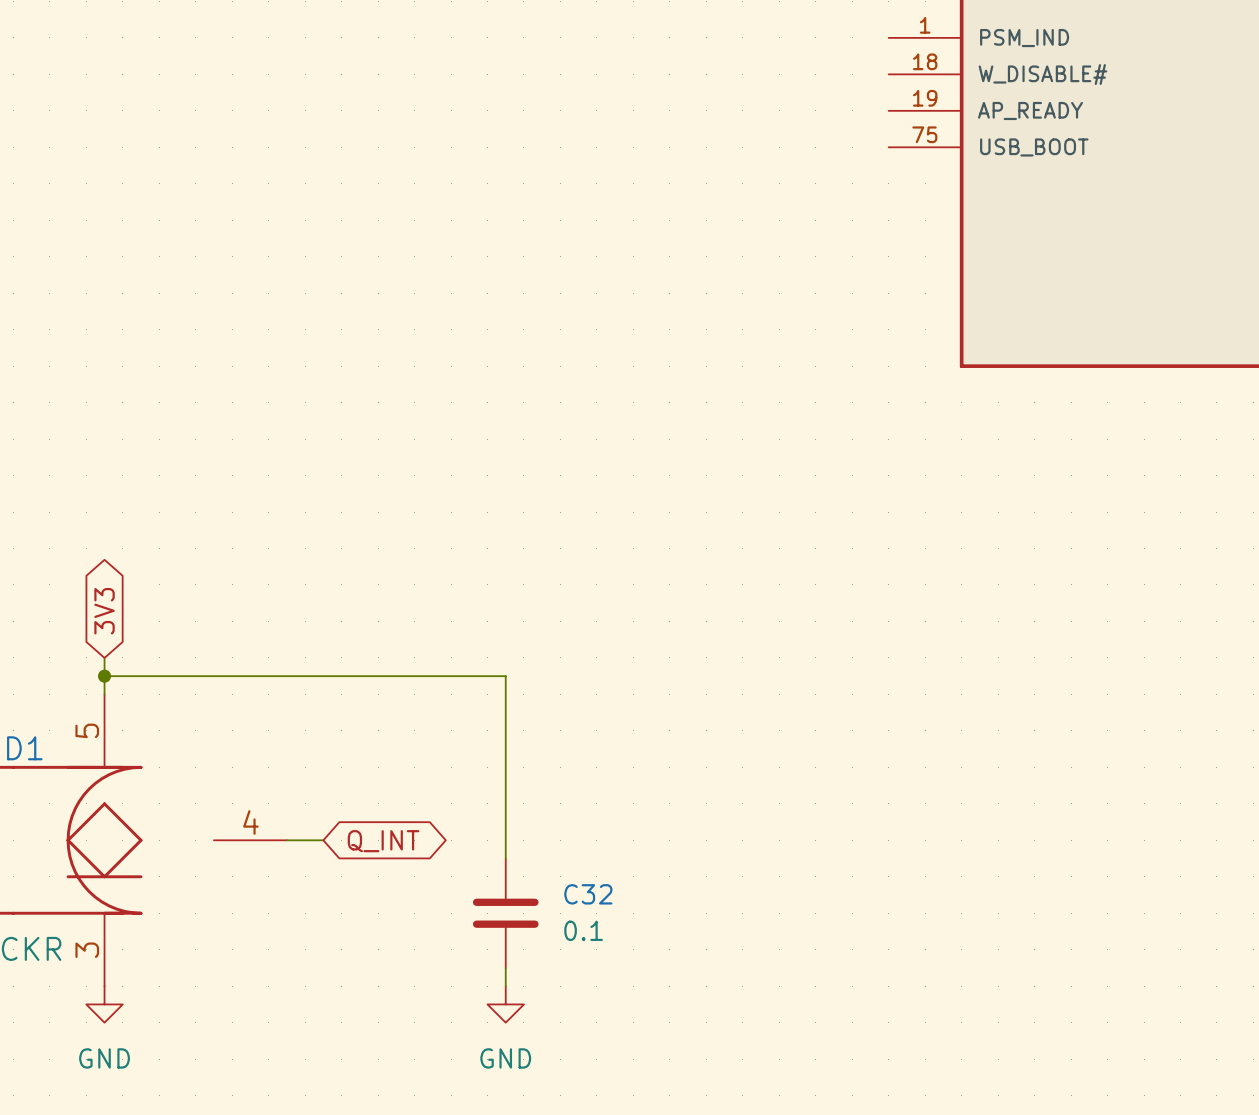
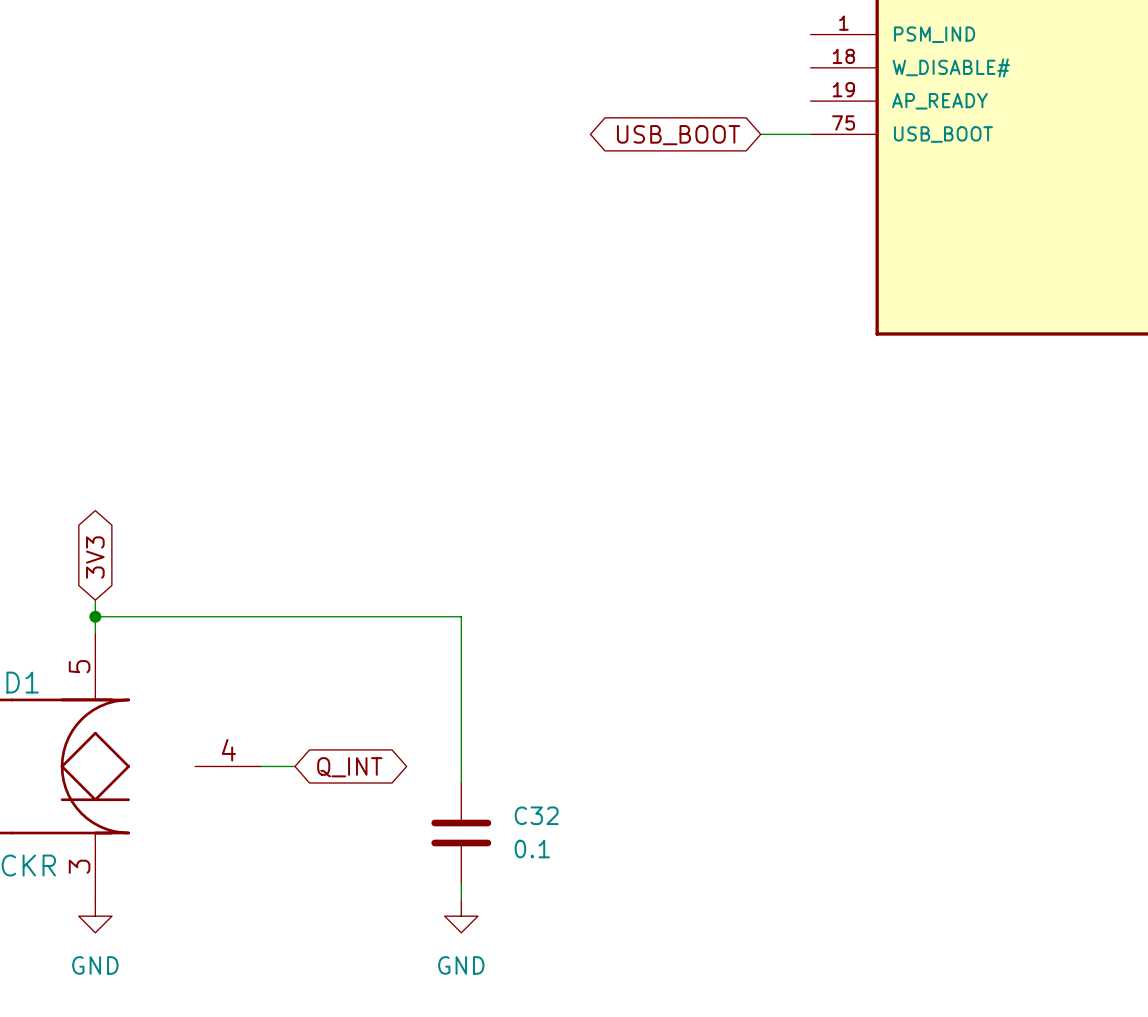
wire: none -> (760, 134) (810, 134)
global label: none -> USB_BOOT (678, 135)

